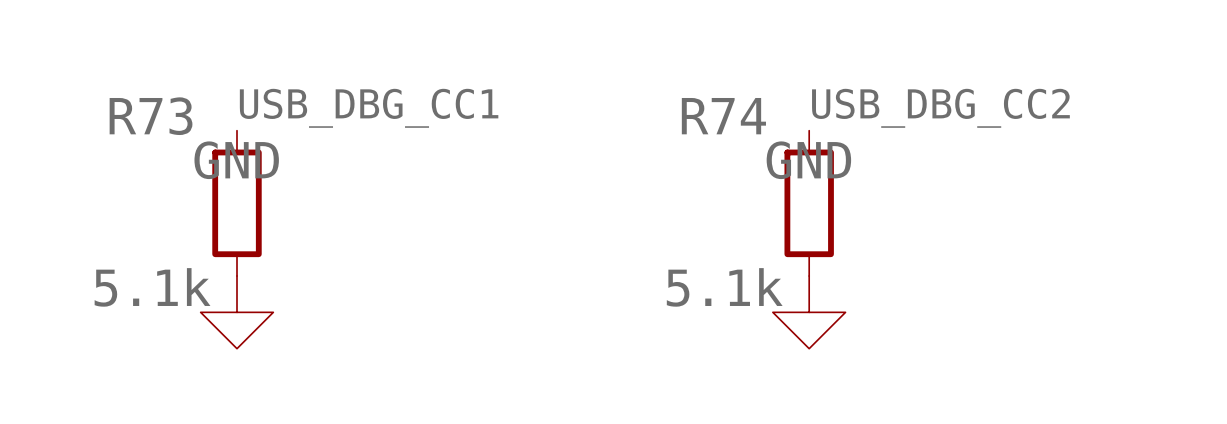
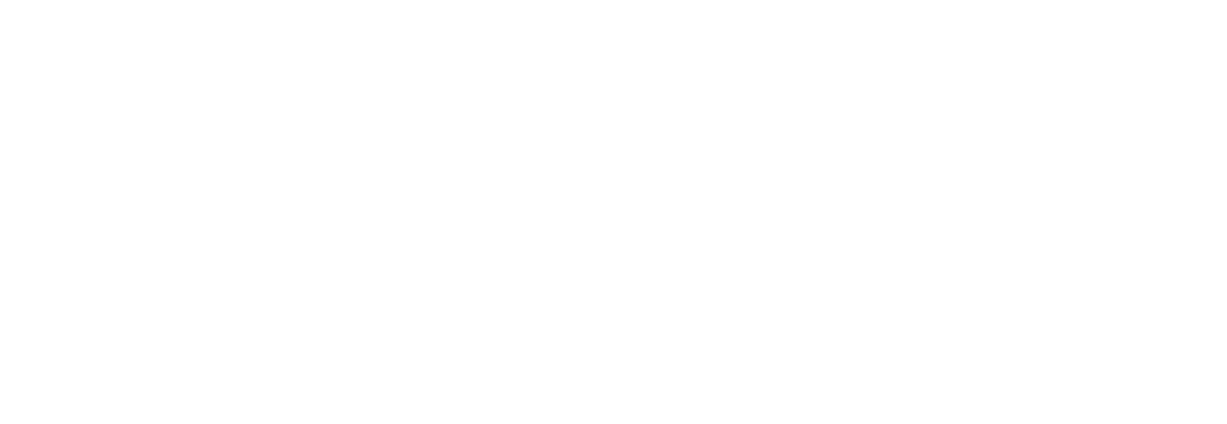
label: USB_DBG_CC1 (369, 108) -> none
label: USB_DBG_CC2 (940, 108) -> none
R73: 5.1k (236, 203) -> none
R74: 5.1k (809, 203) -> none
power symbol: GND (236, 312) -> none
power symbol: GND (809, 312) -> none

